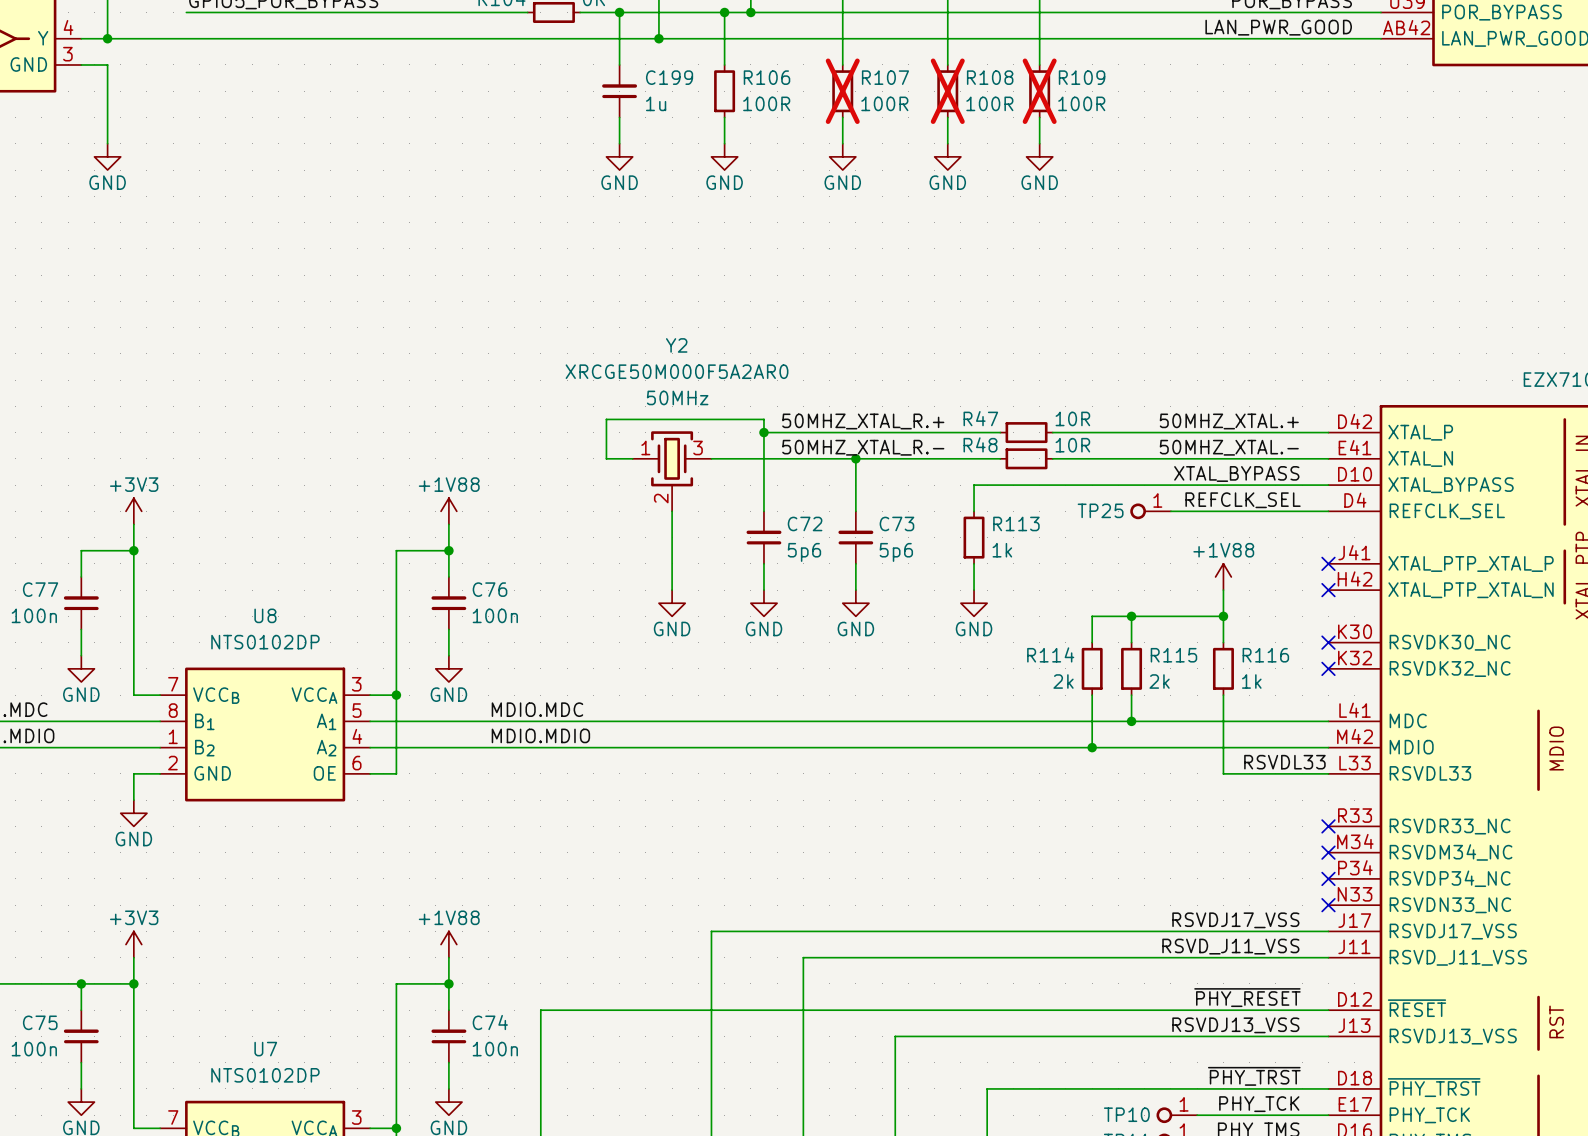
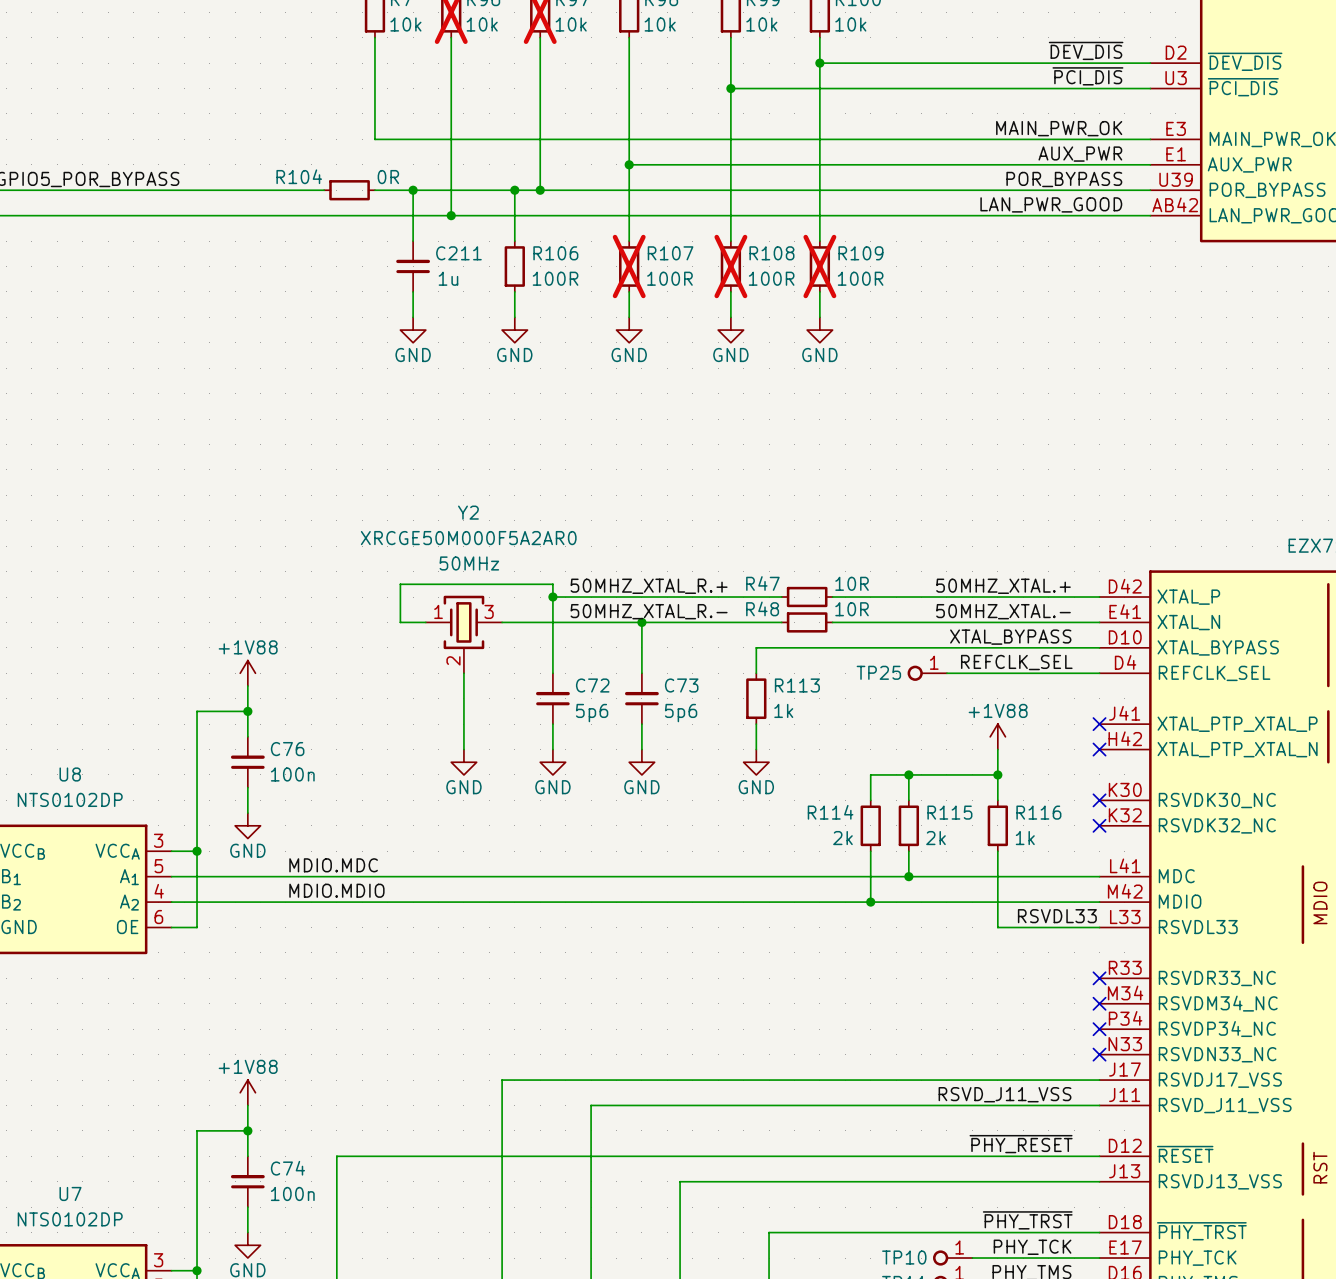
C199 name: C199 (669, 77) -> C211 (458, 253)
label: RSVDJ17_VSS (1235, 920) -> none
label: RSVDJ13_VSS (1235, 1025) -> none

